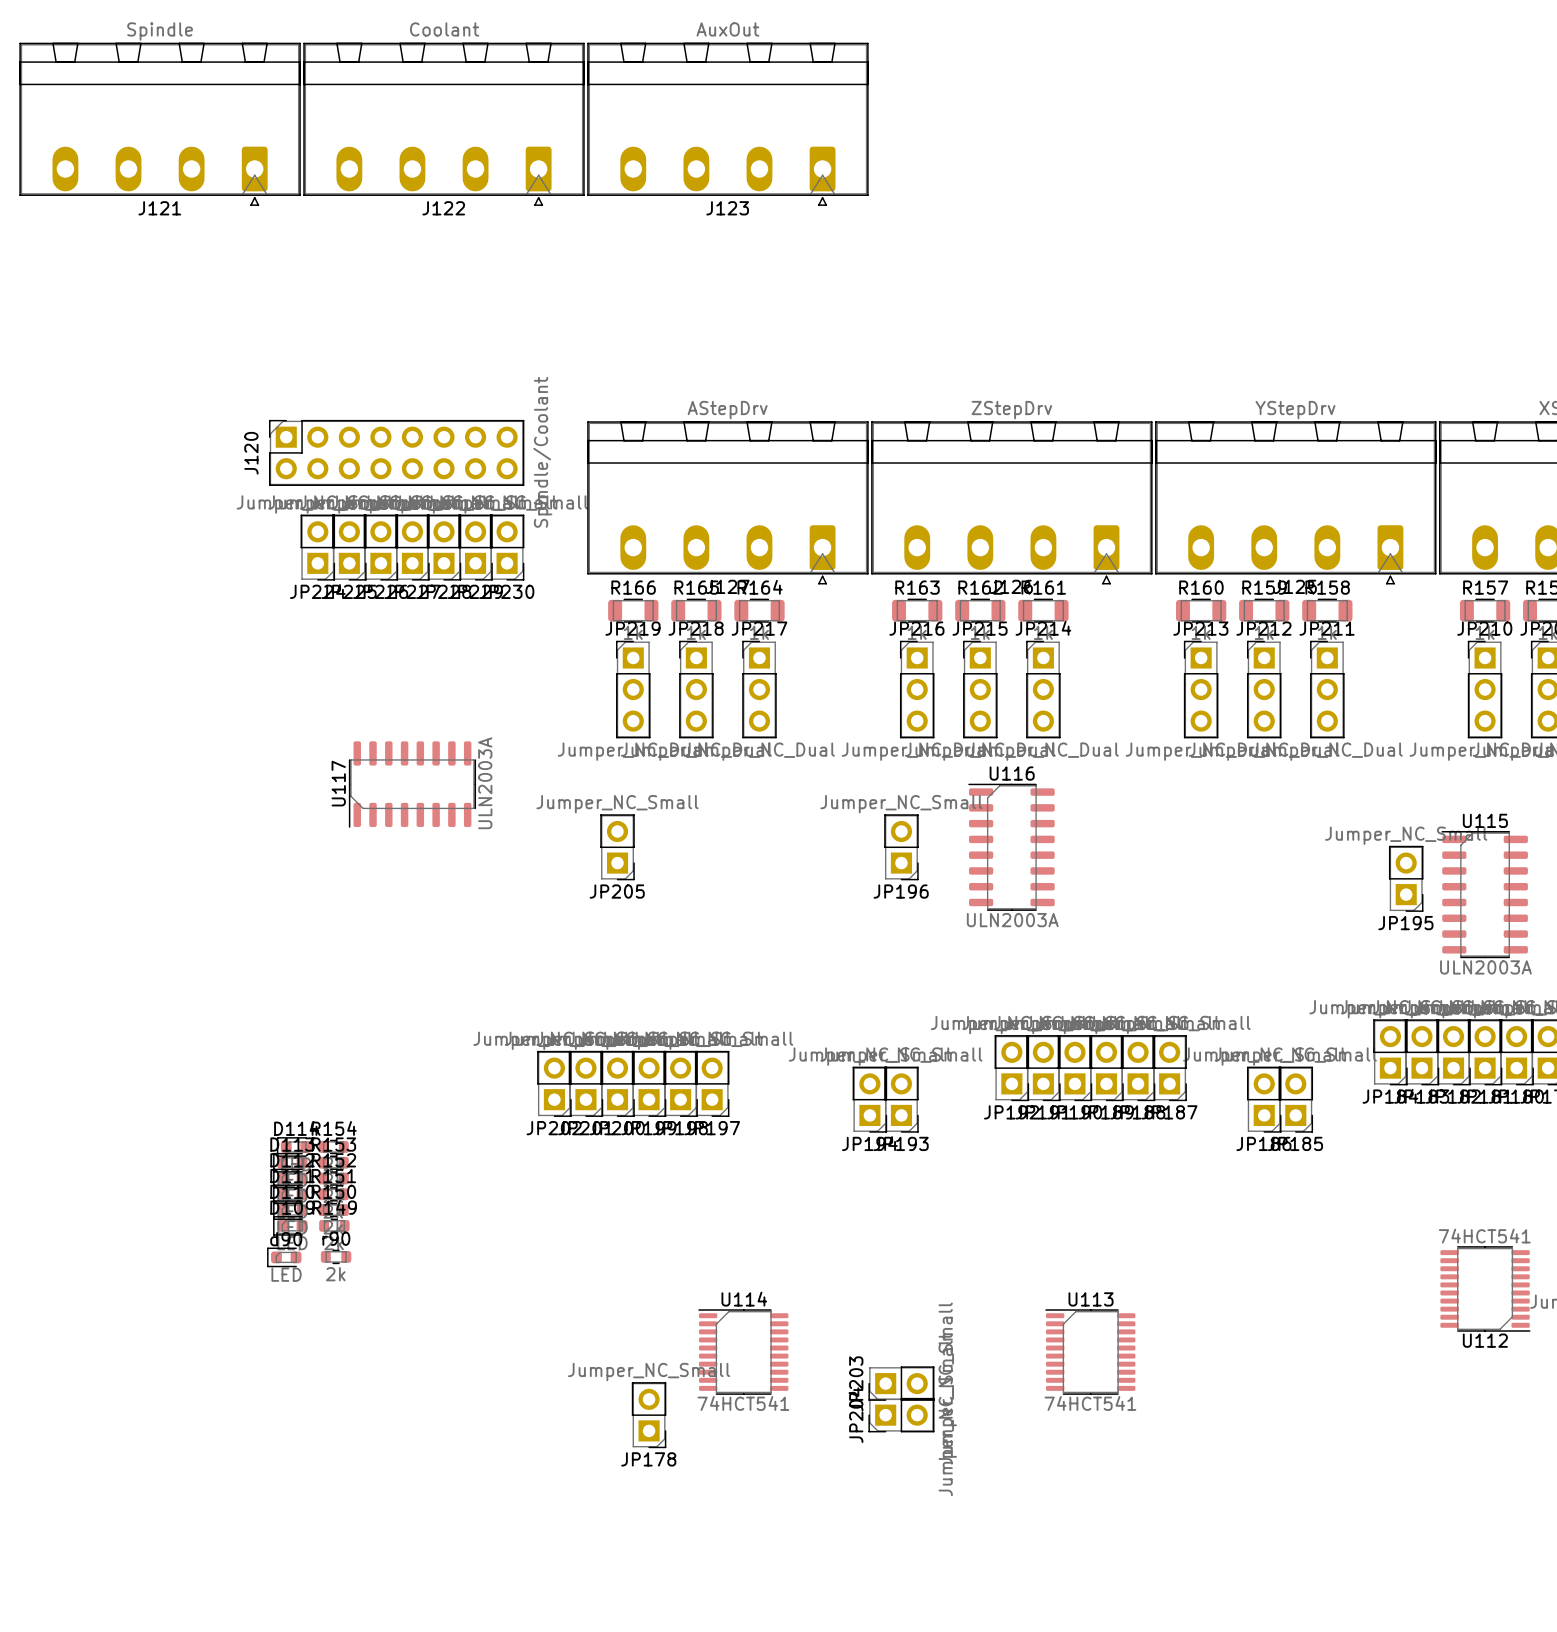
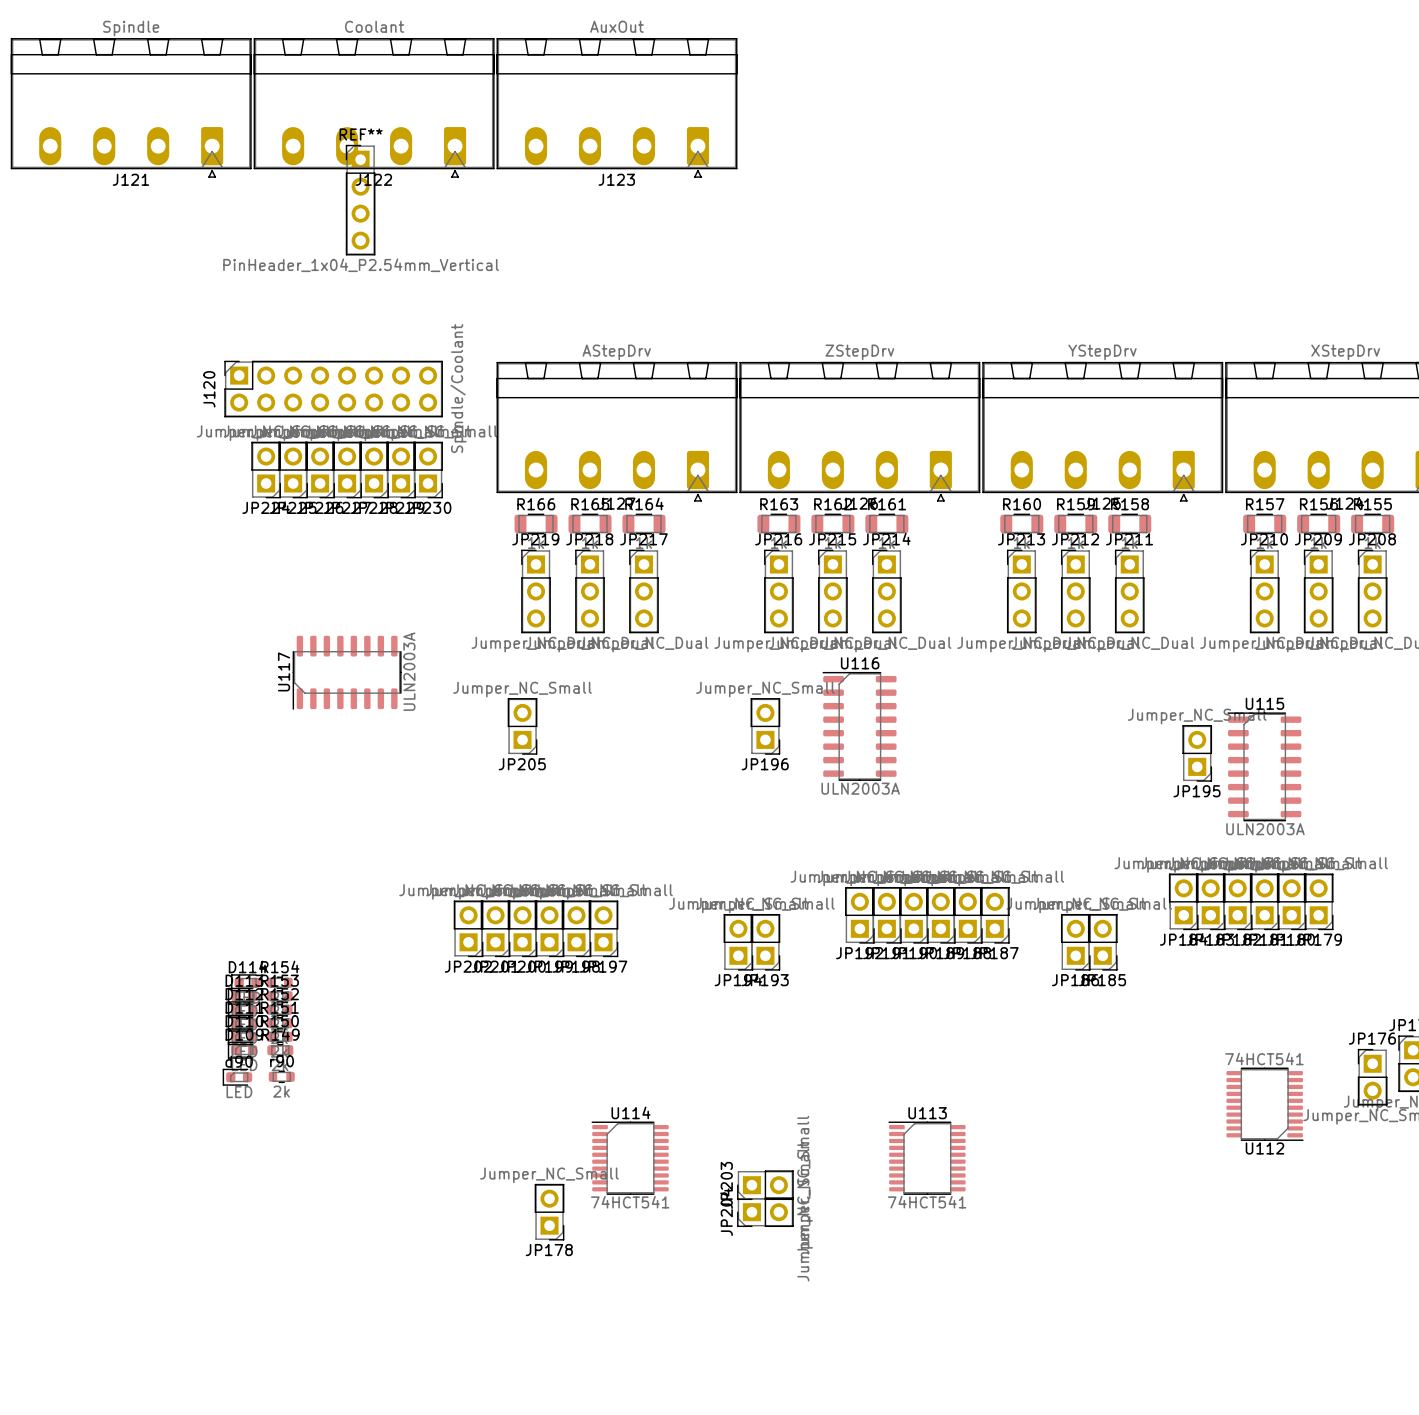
REF**: none -> PinHeader_1x04_P2.54mm_Vertical (360, 200)

